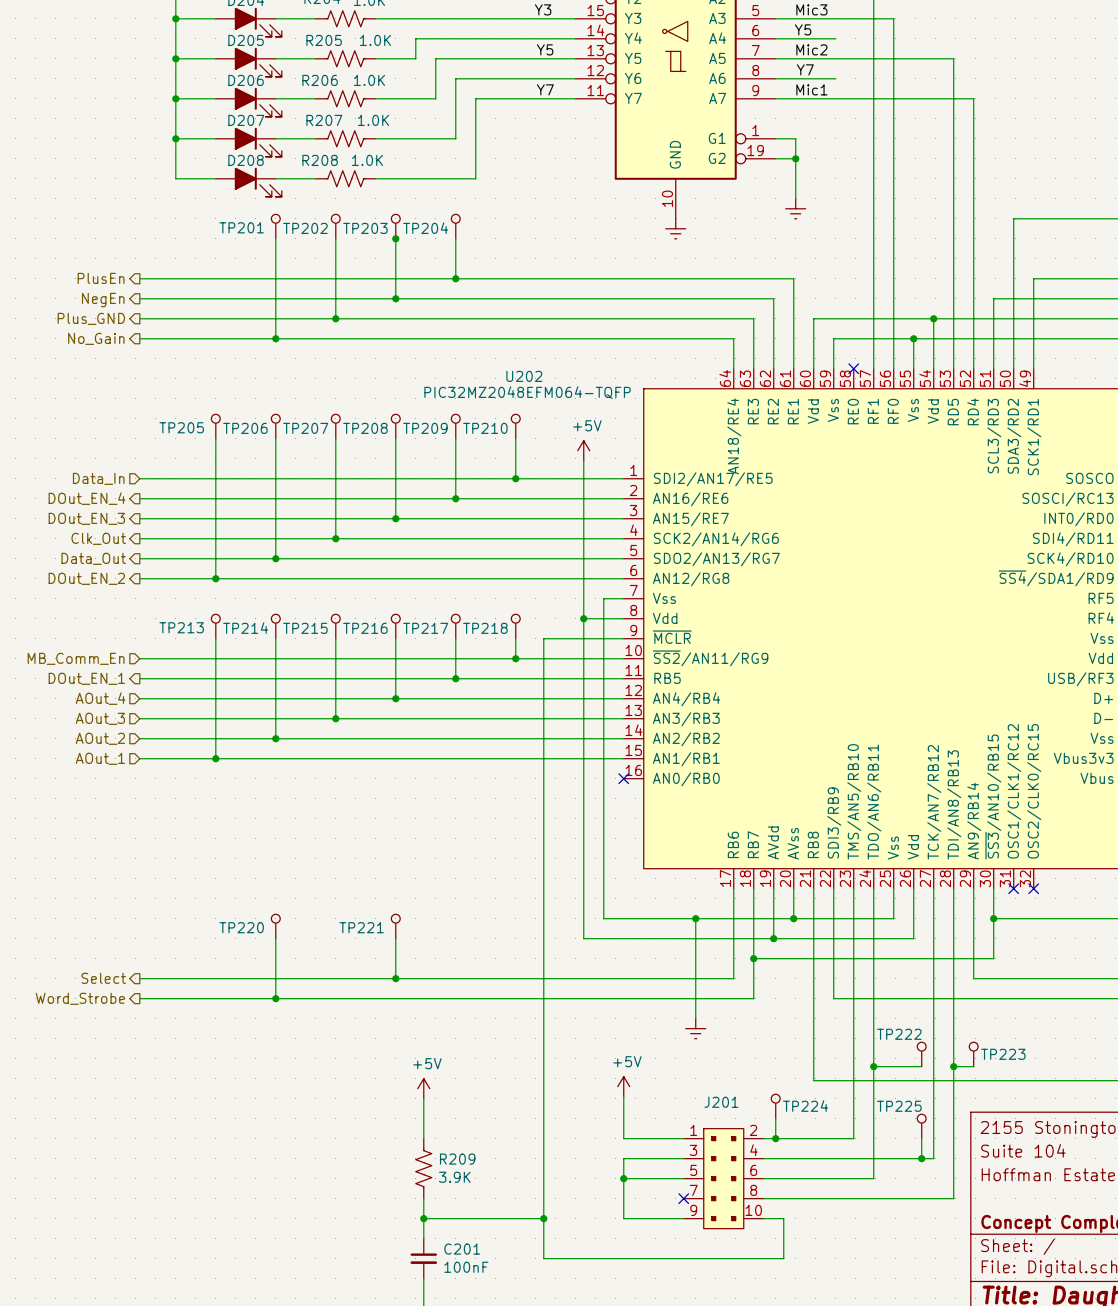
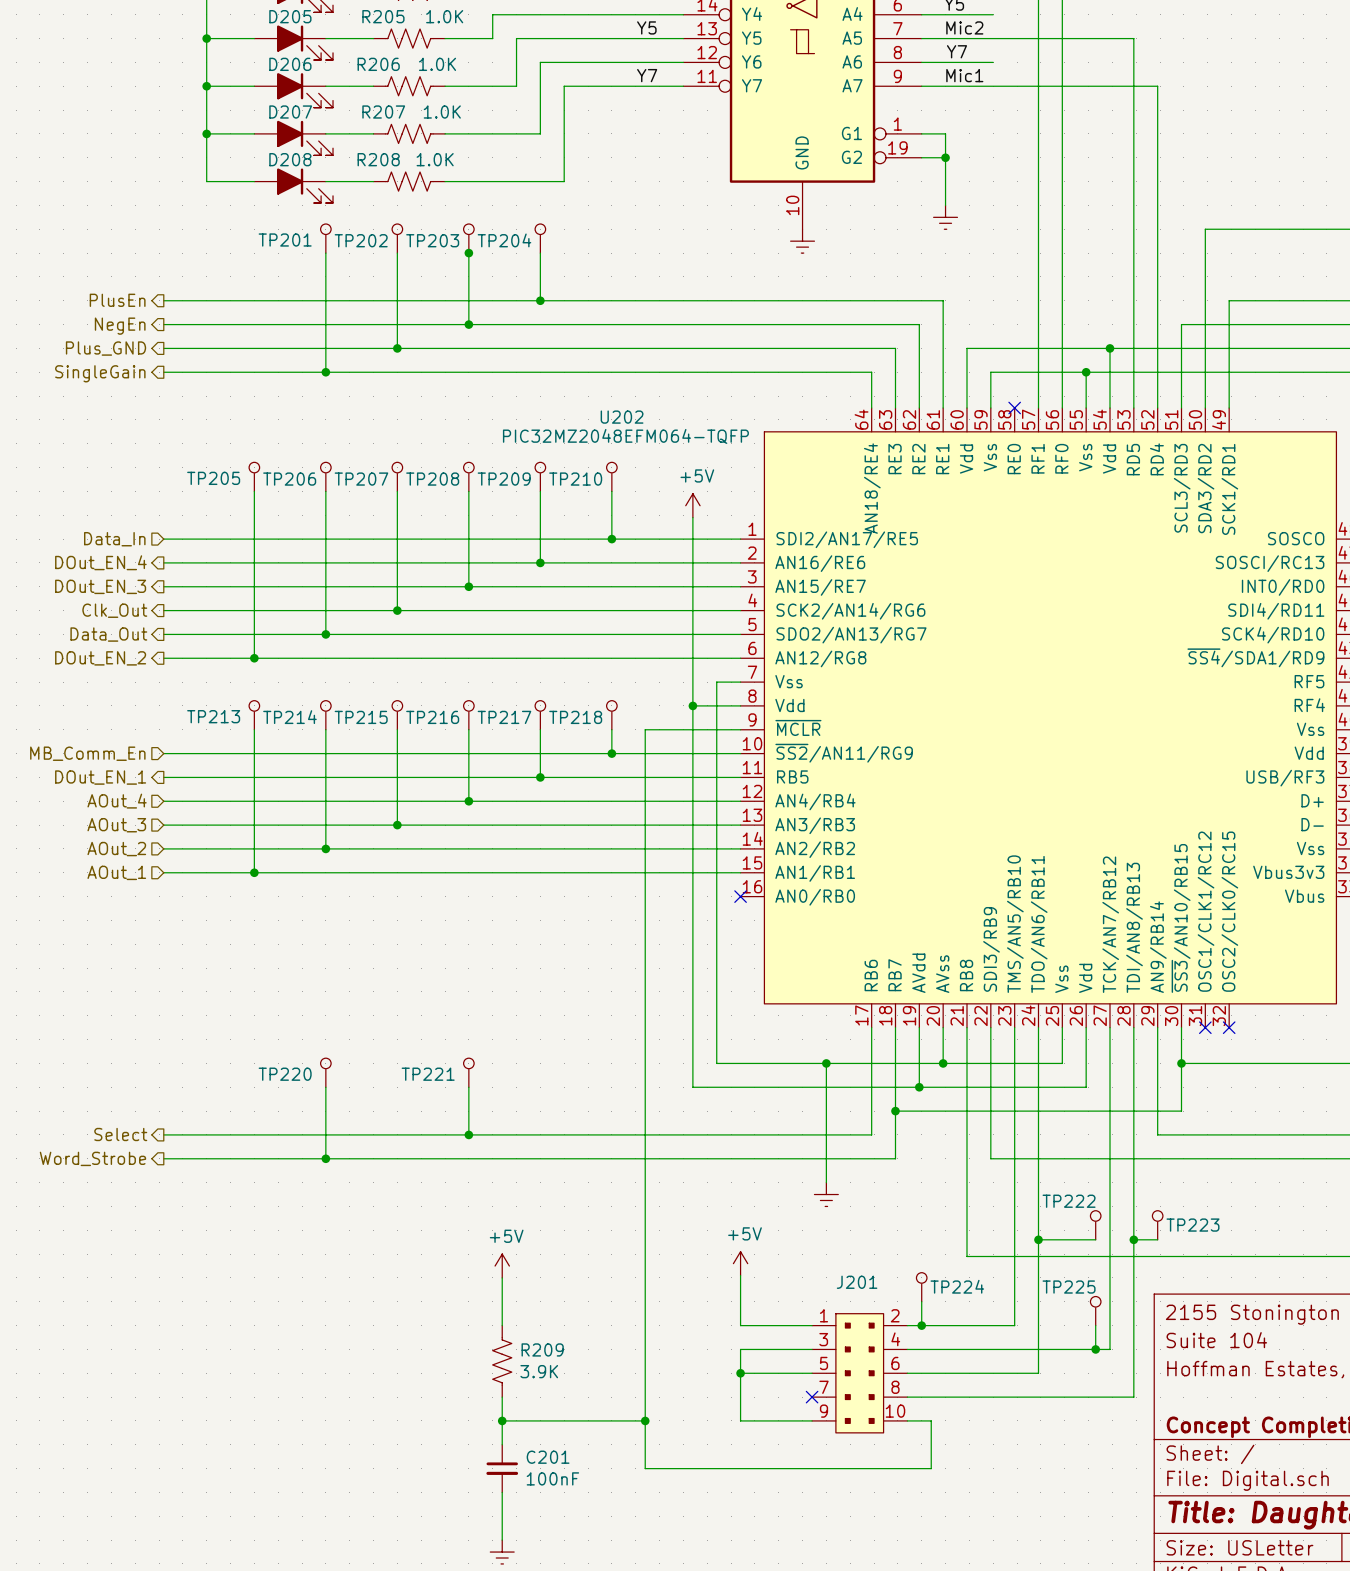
hierarchical label: No_Gain (96, 338) -> SingleGain (100, 373)

